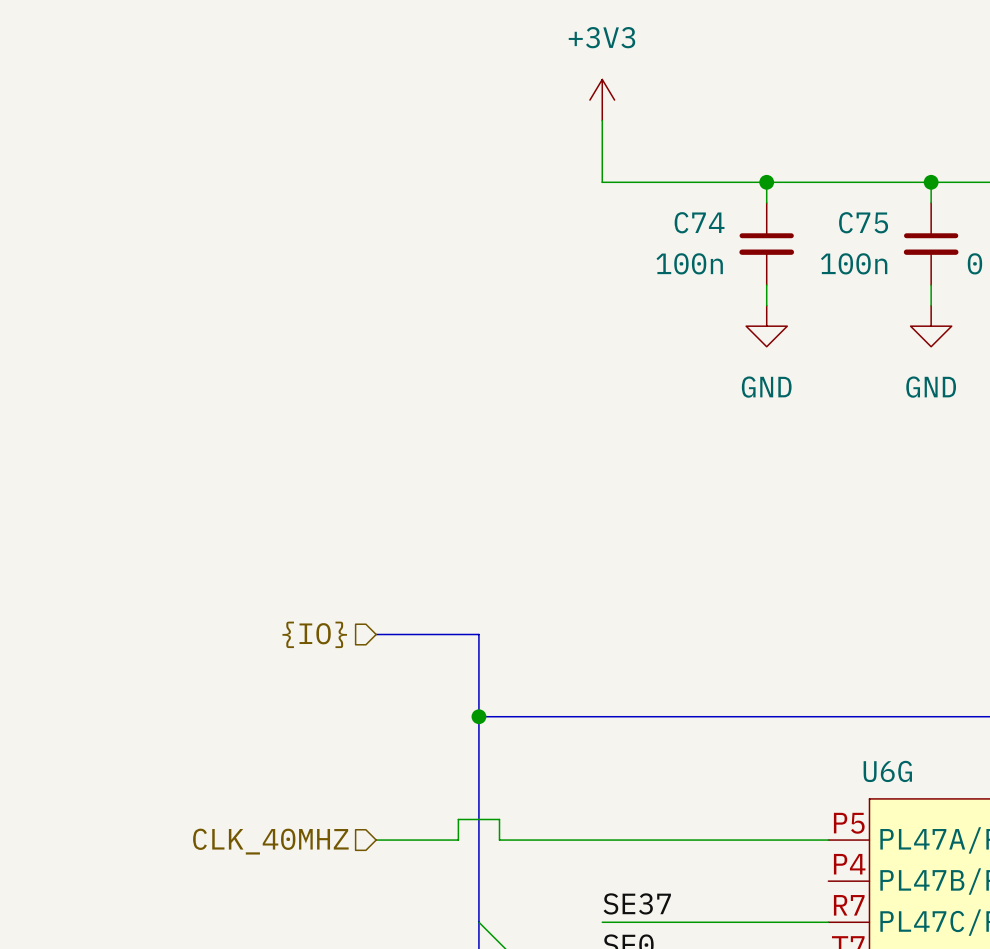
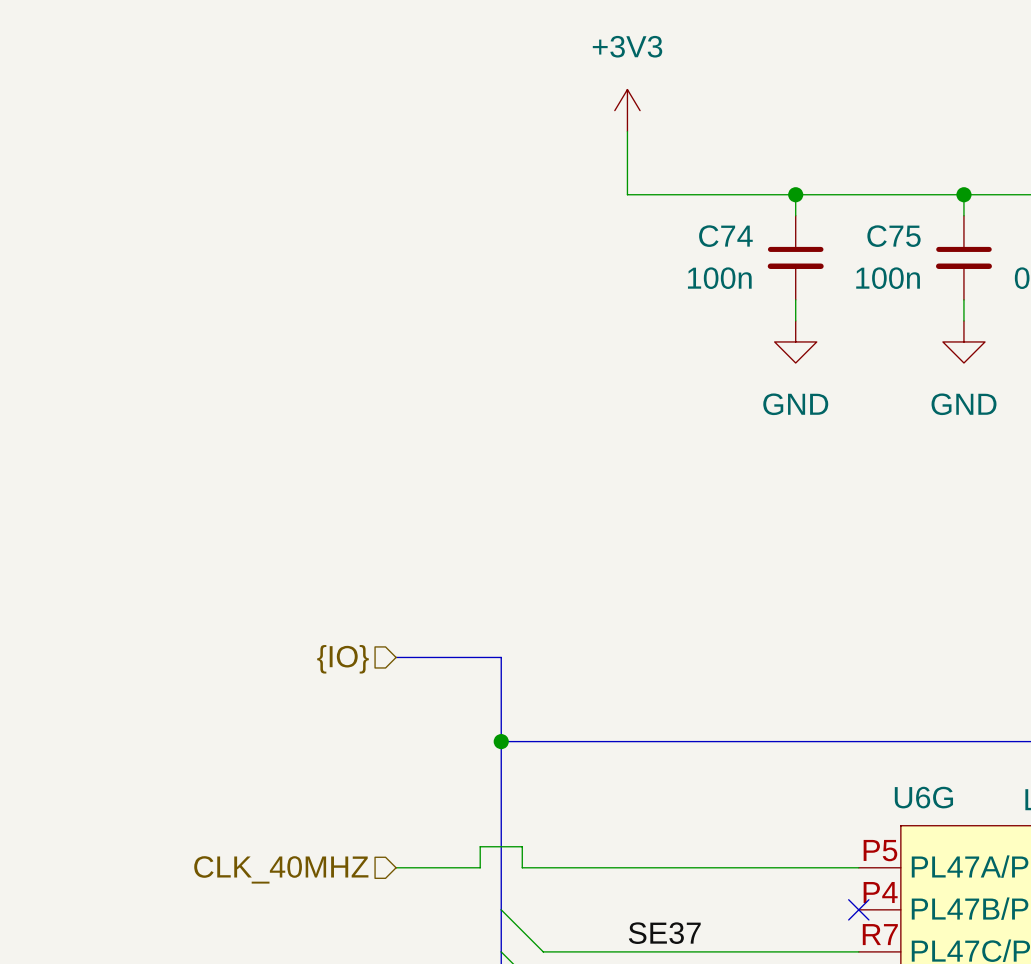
wire: none -> (501, 909) (543, 951) (627, 951)
no-connect mark: none -> (858, 909)

